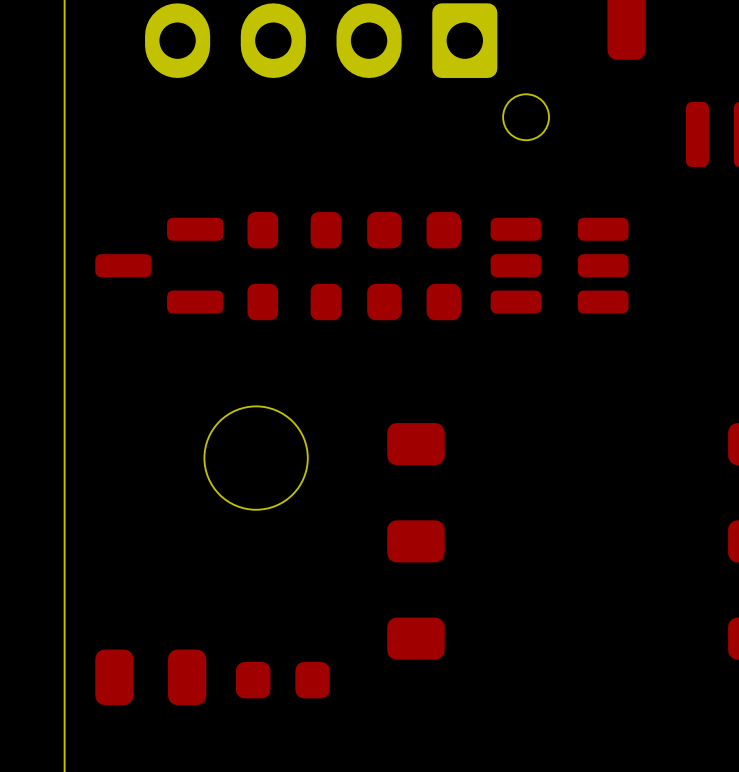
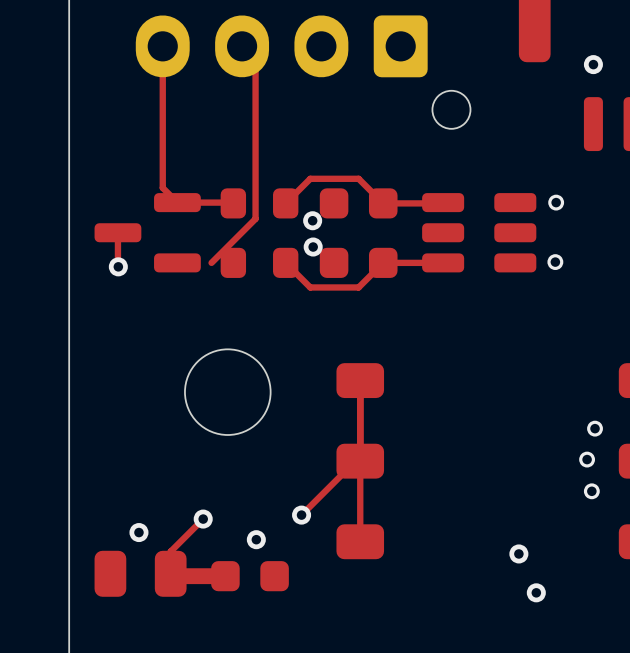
top track: none -> (162, 46) (162, 187) (177, 202) (233, 203)
top track: none -> (242, 46) (255, 59) (255, 218) (211, 262)
via: none -> (593, 64)
top track: none -> (443, 202) (383, 203) (358, 178) (310, 178) (285, 203)
via: none -> (556, 202)
via: none -> (312, 220)
top track: none -> (117, 232) (117, 266)
via: none -> (313, 247)
via: none -> (555, 262)
top track: none -> (443, 262) (383, 262) (358, 287) (310, 287) (285, 262)
via: none -> (118, 266)
top track: none -> (360, 380) (360, 541)
via: none -> (595, 428)
top track: none -> (360, 456) (301, 515)
via: none -> (587, 459)
via: none -> (591, 491)
via: none -> (301, 515)
top track: none -> (203, 519) (170, 551) (170, 573) (173, 576) (225, 576) (223, 573)
via: none -> (203, 519)
via: none -> (138, 532)
via: none -> (256, 539)
via: none -> (518, 553)
via: none -> (536, 592)

